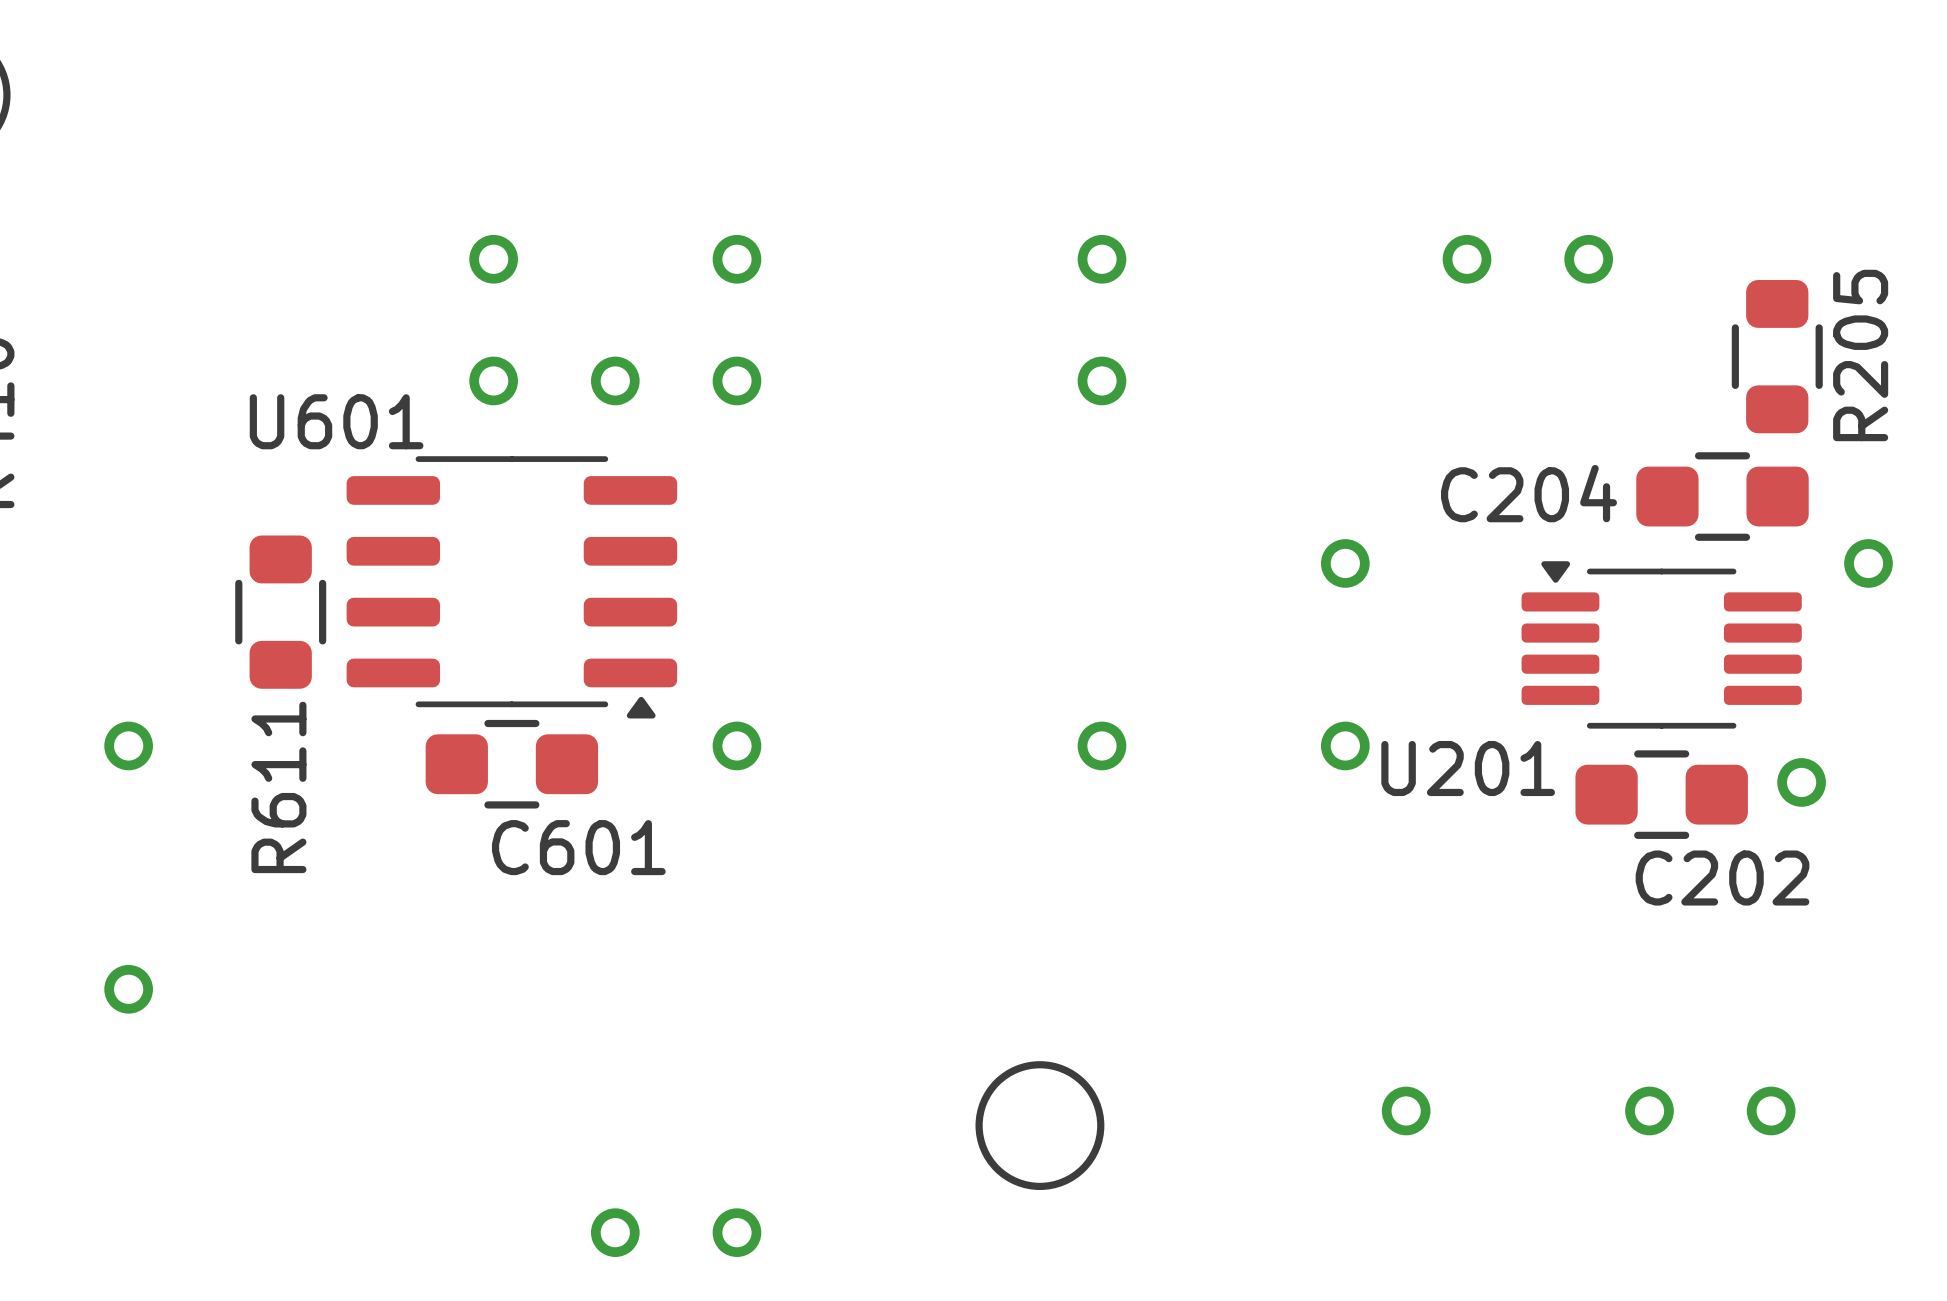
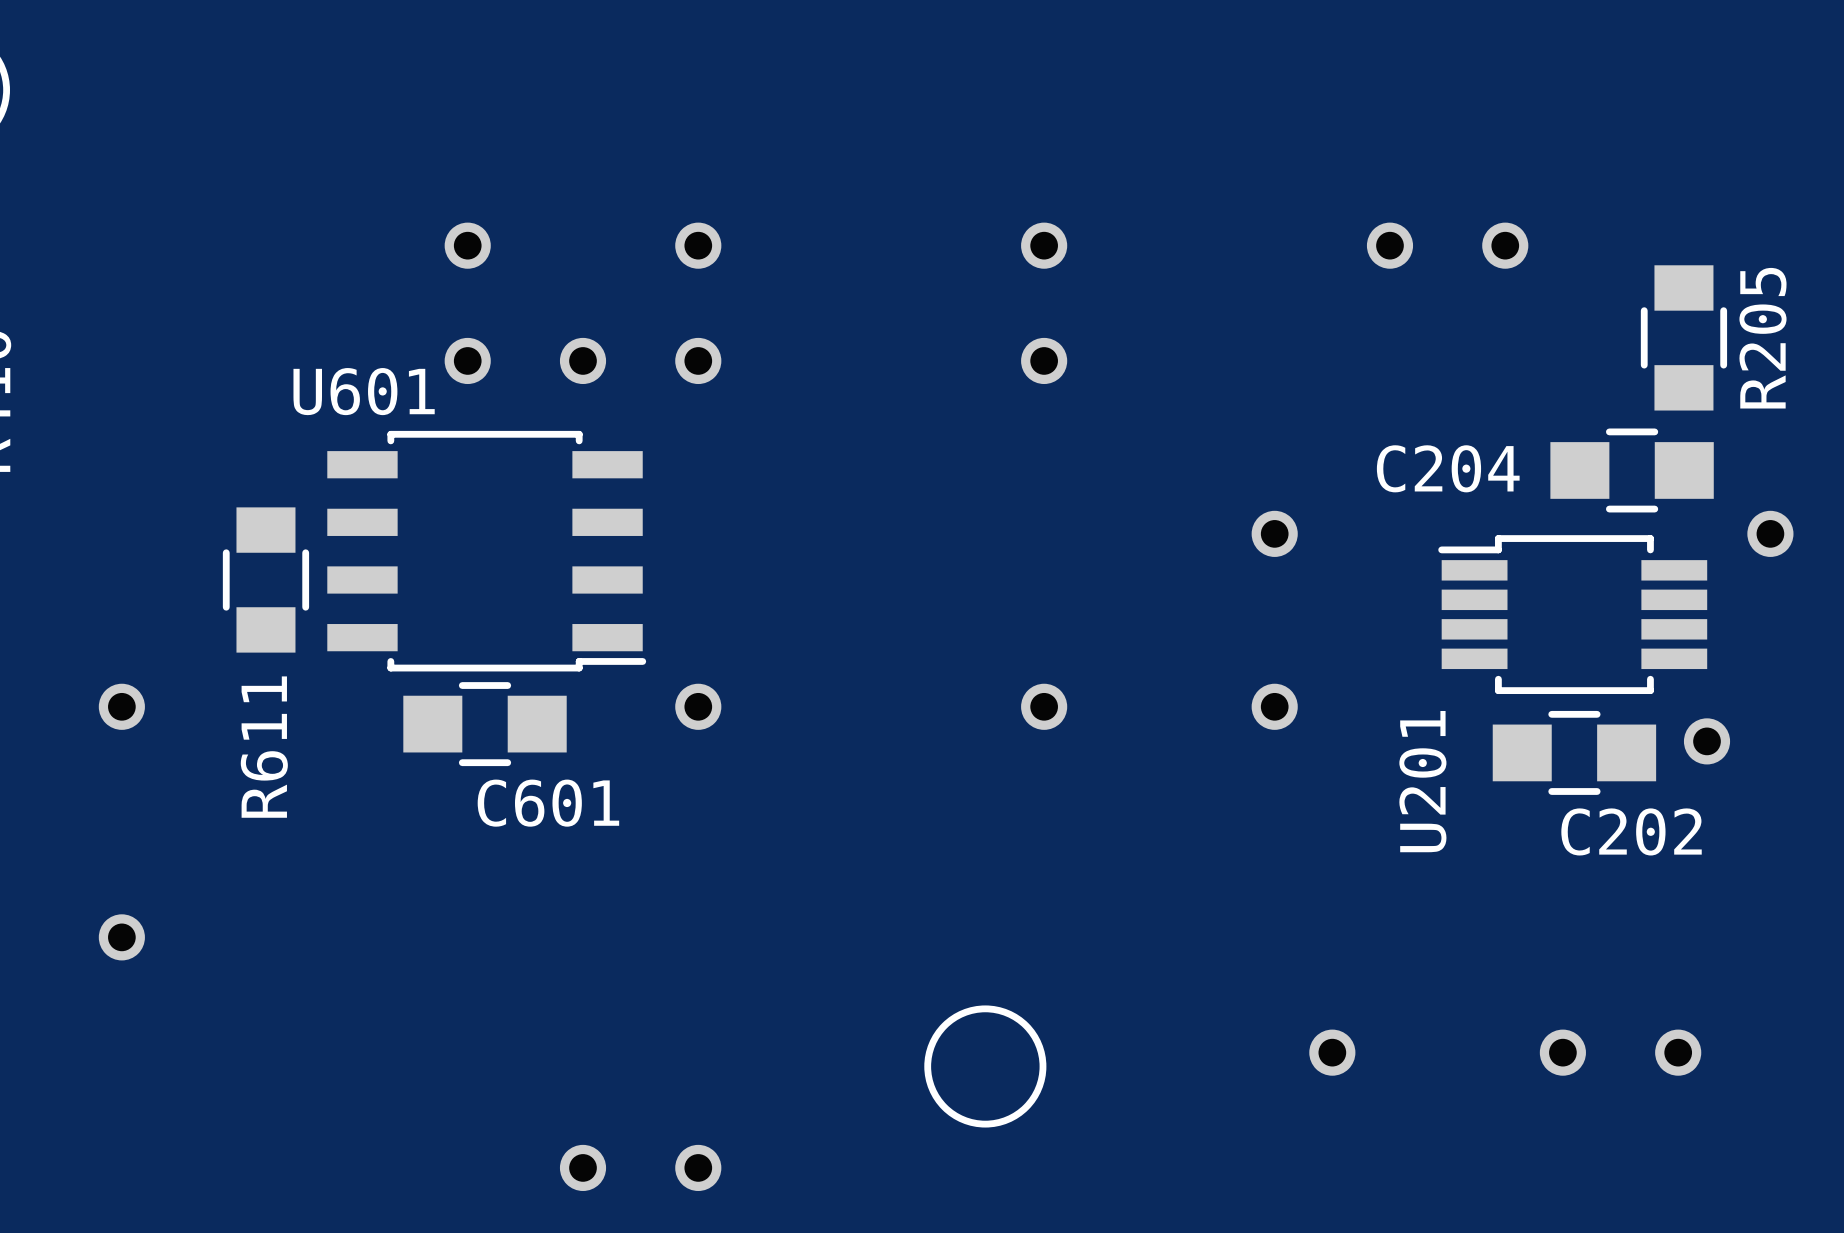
R205 footprint: [1731, 279, 1823, 434] -> [1640, 265, 1728, 411]
U601 name position: U601 (336, 421) -> U601 (364, 391)
C204 footprint: [1636, 452, 1809, 541] -> [1550, 428, 1714, 513]
U601 footprint: [346, 456, 678, 719] -> [327, 430, 647, 672]
R611 footprint: [235, 535, 327, 689] -> [222, 507, 310, 653]
U201 footprint: [1521, 561, 1802, 729] -> [1438, 535, 1708, 695]
C601 footprint: [425, 719, 599, 809] -> [403, 682, 567, 767]
C202 footprint: [1575, 750, 1748, 839] -> [1492, 710, 1657, 795]
U201 name rotation: 0° (1468, 768) -> 90° counterclockwise (1422, 781)

